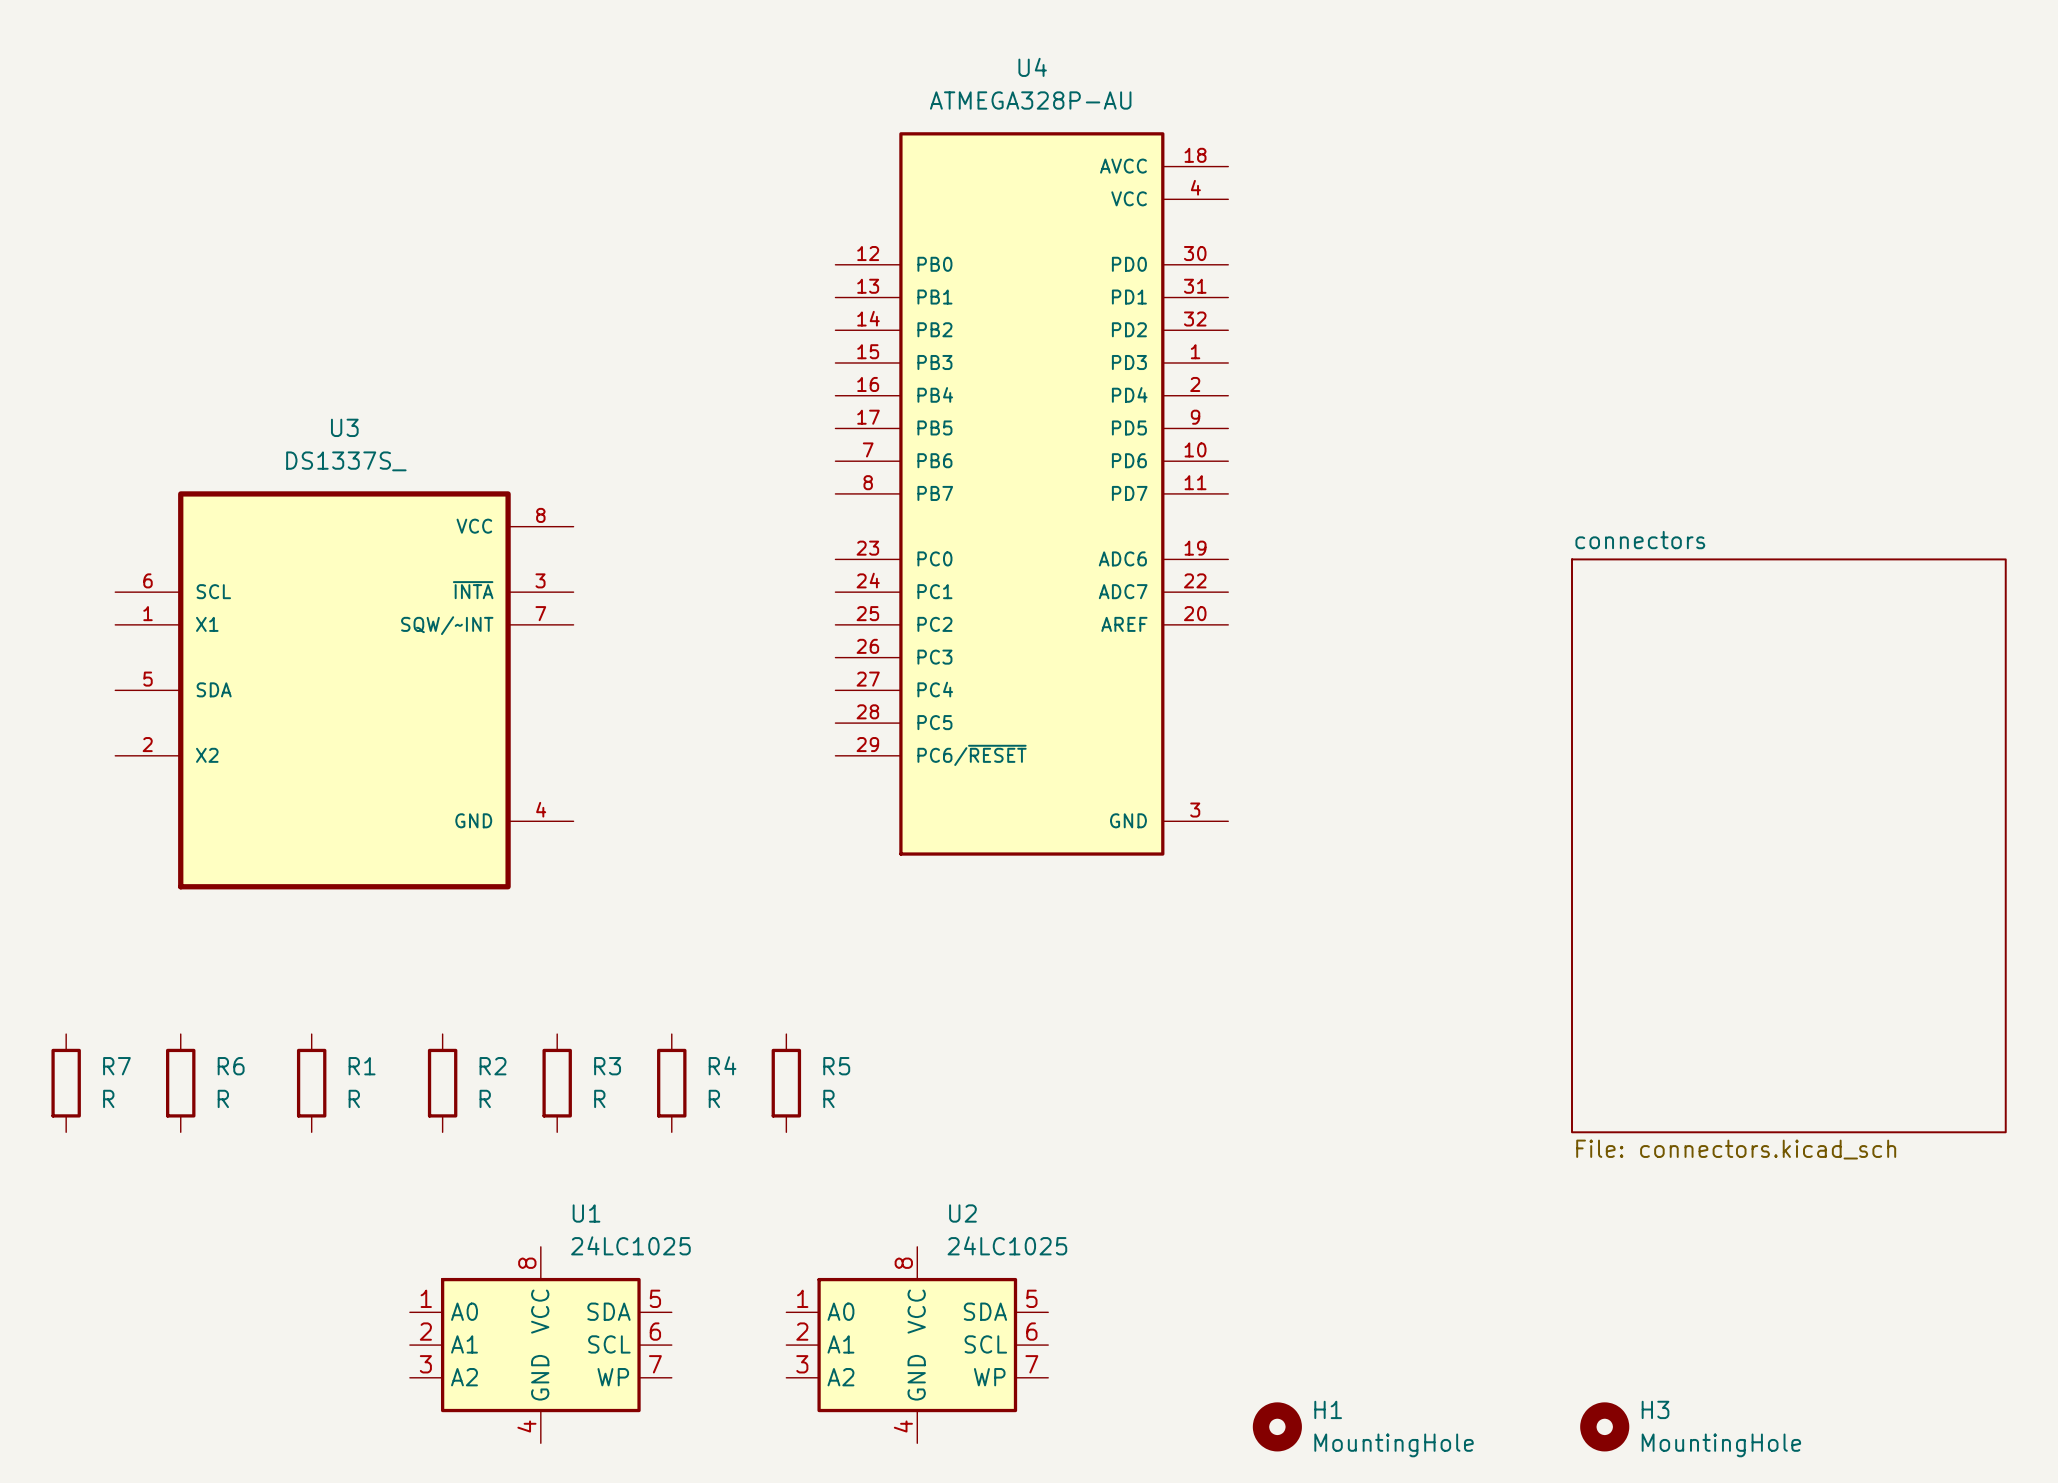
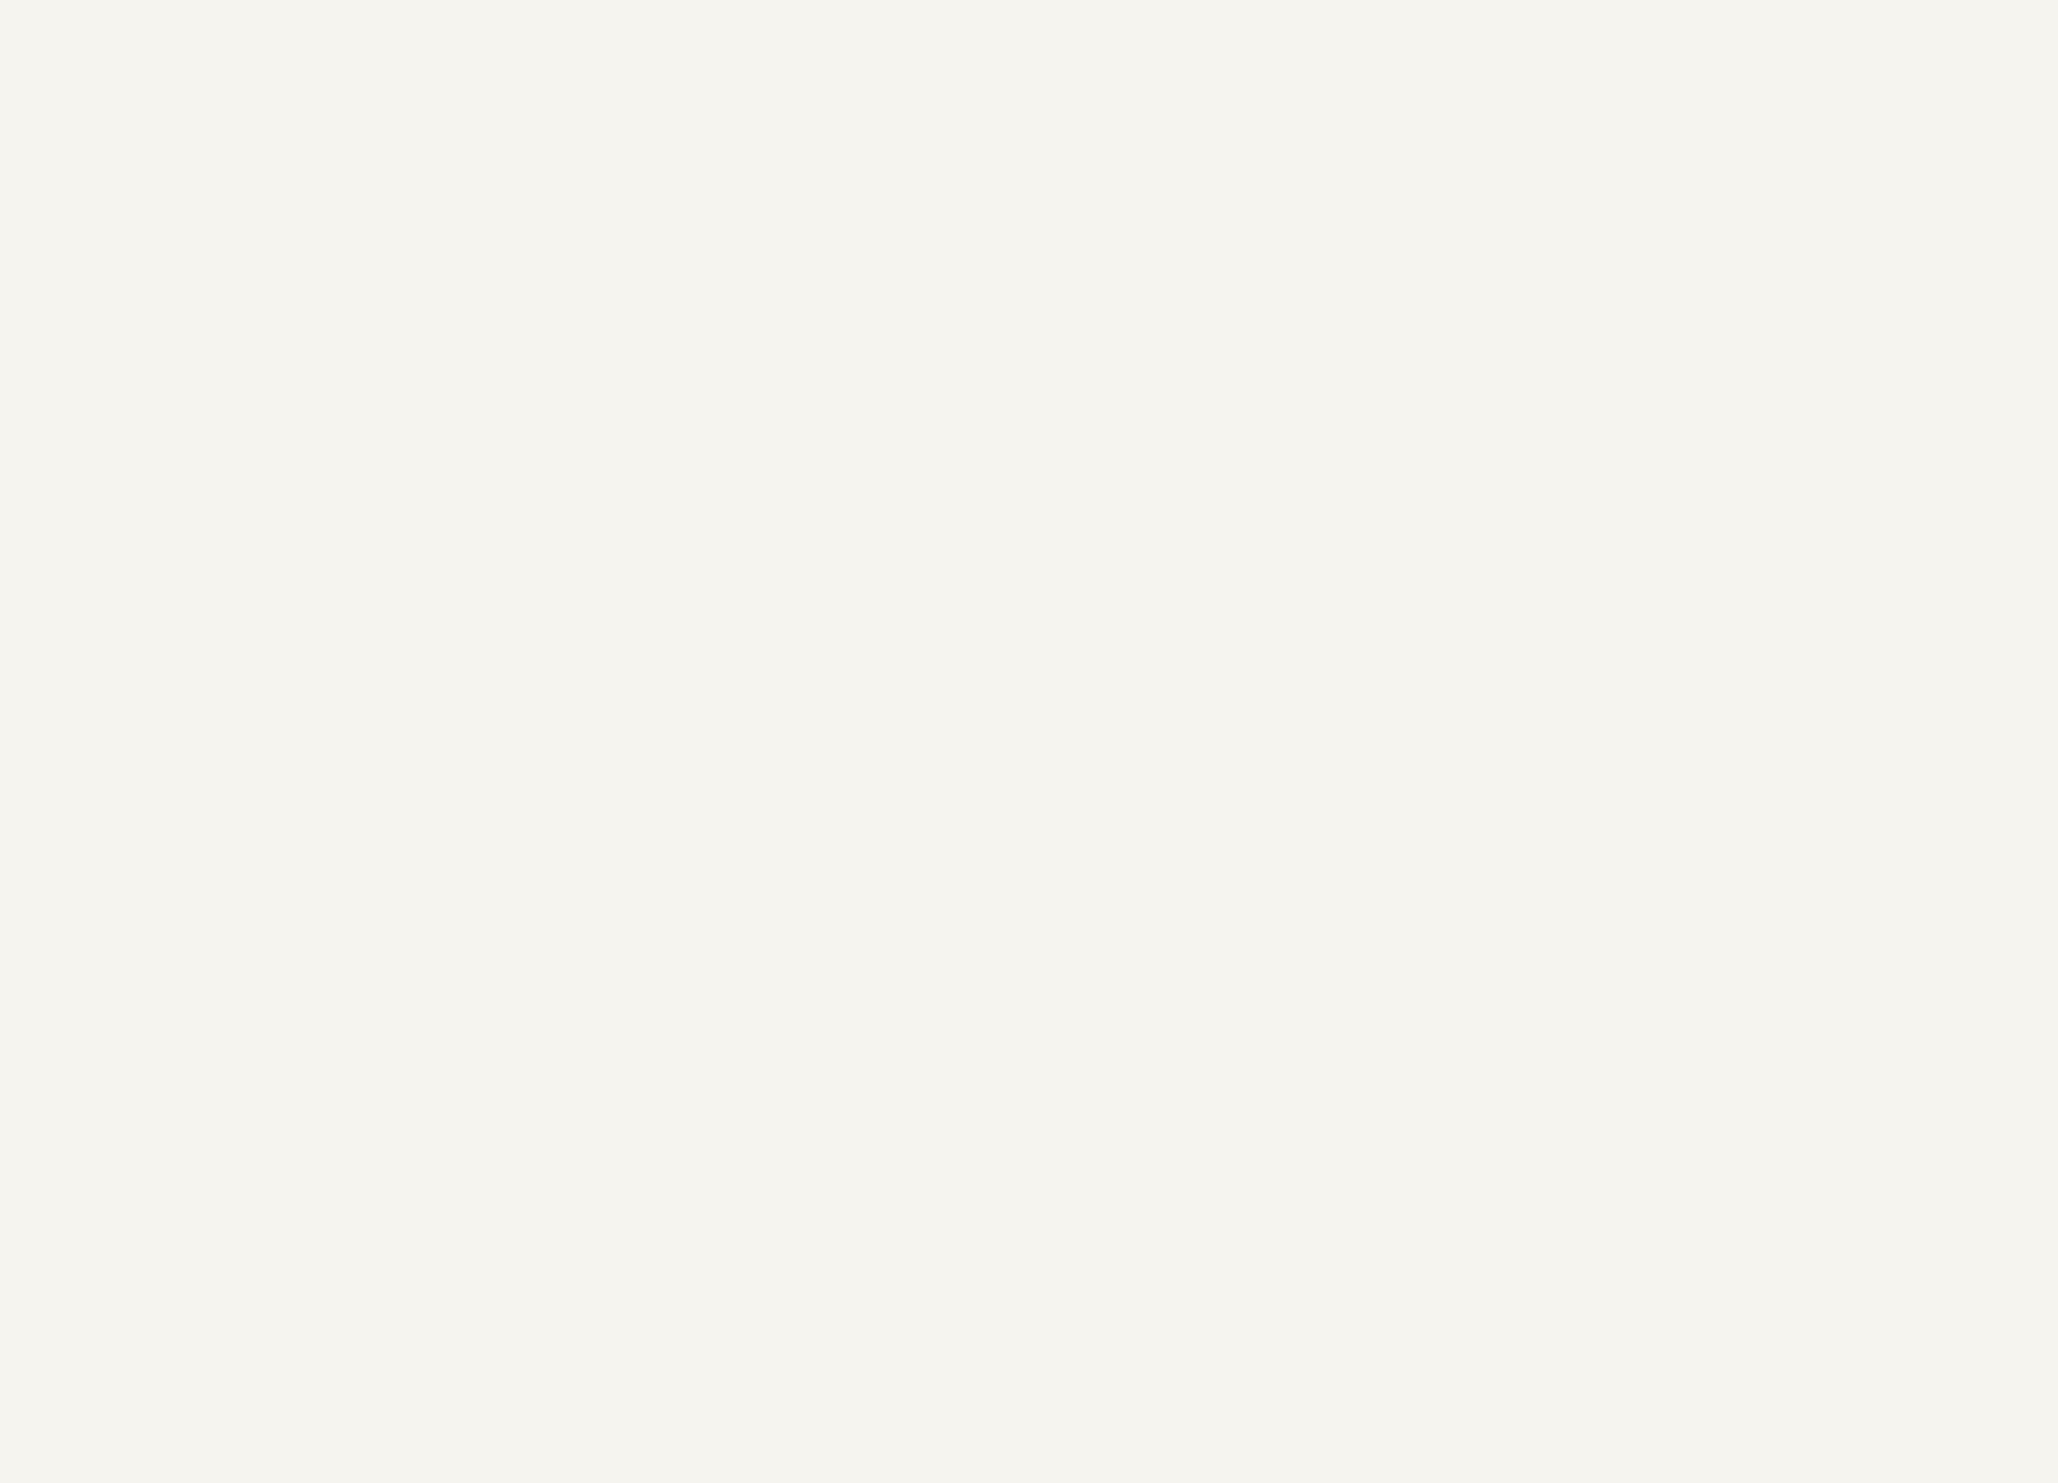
U4: ATMEGA328P-AU (1031, 493) -> none
U3: DS1337S_ (344, 690) -> none
sheet connectors: File: connectors.kicad_sch (1788, 845) -> none
R7: R (66, 1083) -> none
R6: R (180, 1083) -> none
R1: R (311, 1083) -> none
R2: R (442, 1083) -> none
R3: R (557, 1083) -> none
R4: R (671, 1083) -> none
R5: R (786, 1083) -> none
U1: 24LC1025 (540, 1345) -> none
U2: 24LC1025 (917, 1345) -> none
H1: MountingHole (1277, 1426) -> none
H3: MountingHole (1604, 1426) -> none

